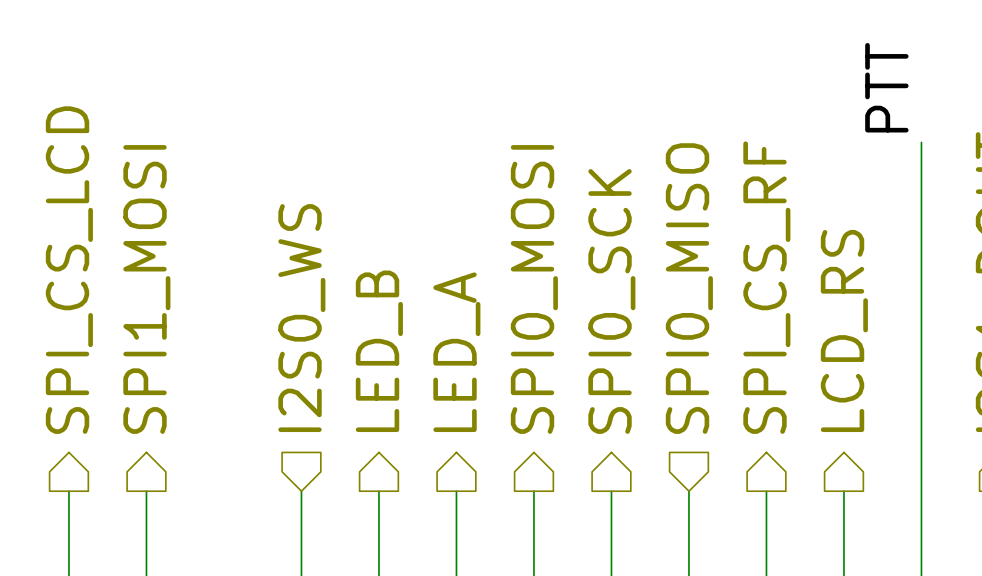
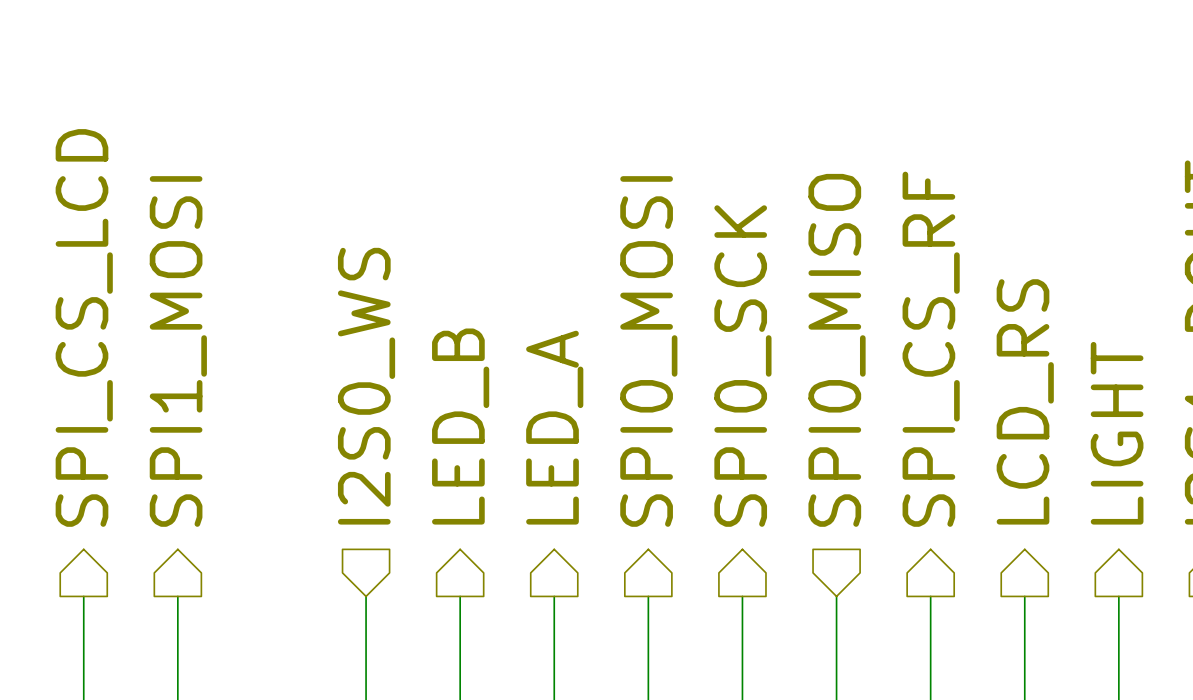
label: PTT (886, 87) -> none
wire: (921, 142) (921, 491) -> none
hierarchical label: none -> LIGHT (1117, 433)

